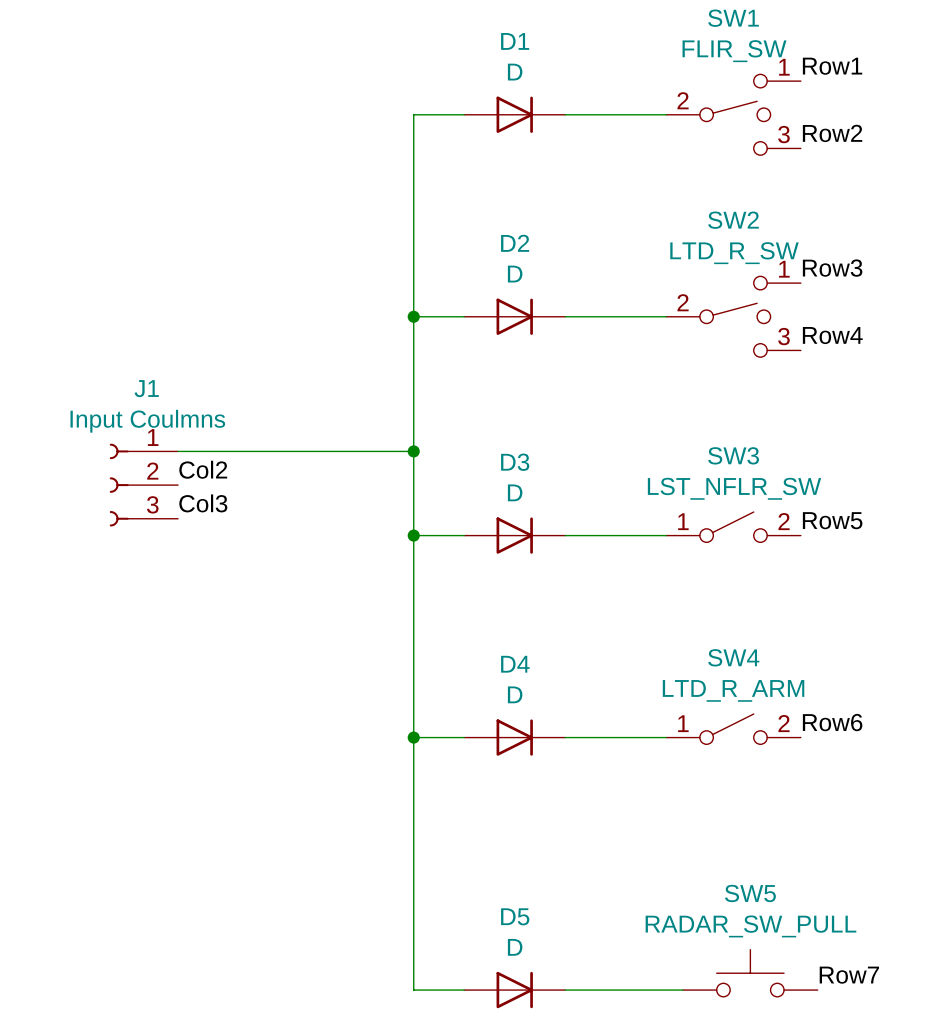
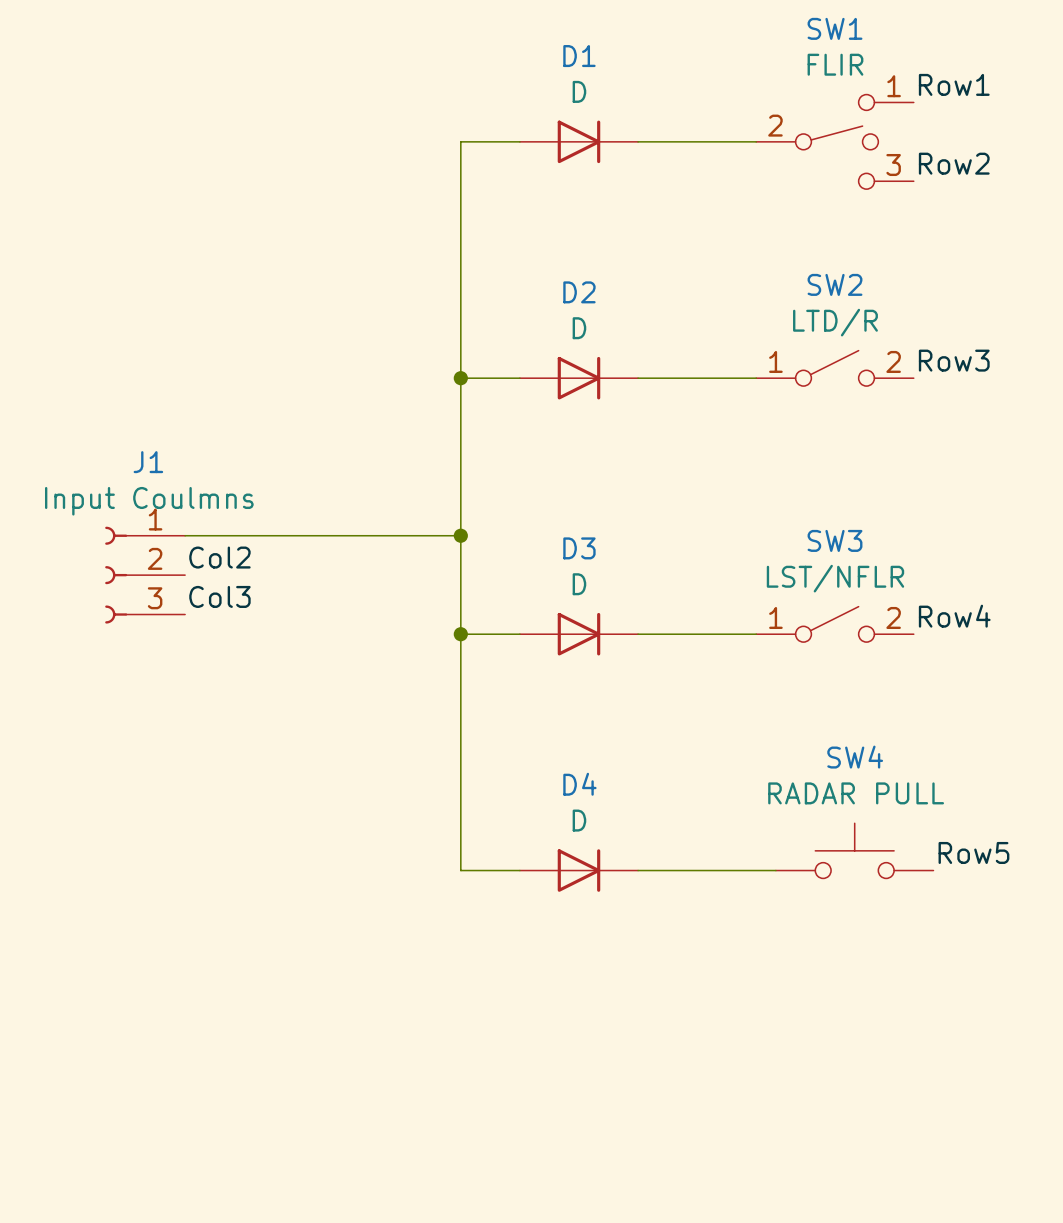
SW1 value: FLIR_SW (734, 51) -> FLIR (835, 64)
SW2 value: LTD_R_SW (734, 253) -> LTD/R (835, 322)
label position: Row3 (832, 268) -> Row3 (954, 360)
SW2 symbol: [666, 276, 801, 358] -> [756, 350, 914, 387]
label: Row4 (832, 335) -> none
SW3 value: LST_NFLR_SW (734, 488) -> LST/NFLR (835, 578)
label: Row5 (832, 520) -> Row4 (954, 616)
SW4 value: LTD_R_ARM (733, 690) -> RADAR PULL (856, 793)
SW4 symbol: [666, 714, 801, 745] -> [775, 823, 934, 879]
label: Row6 (832, 722) -> Row5 (973, 852)
wire: (413, 737) (413, 990) (464, 990) -> none
junction: (413, 737) -> none
SW5: RADAR_SW_PULL (750, 973) -> none
label: Row7 (849, 975) -> none
D5: D (514, 990) -> none
wire: (565, 990) (683, 990) -> none

